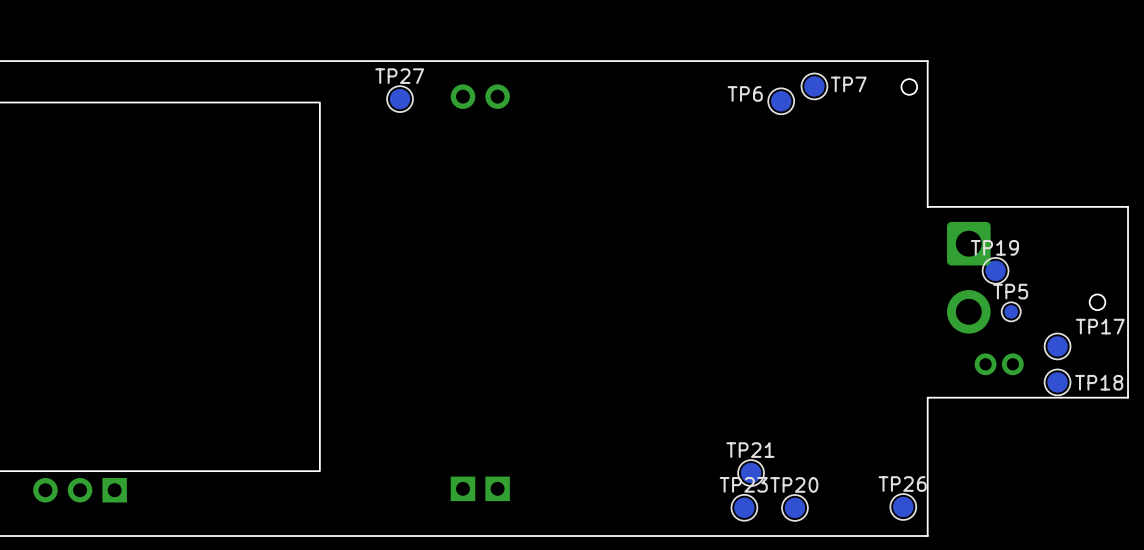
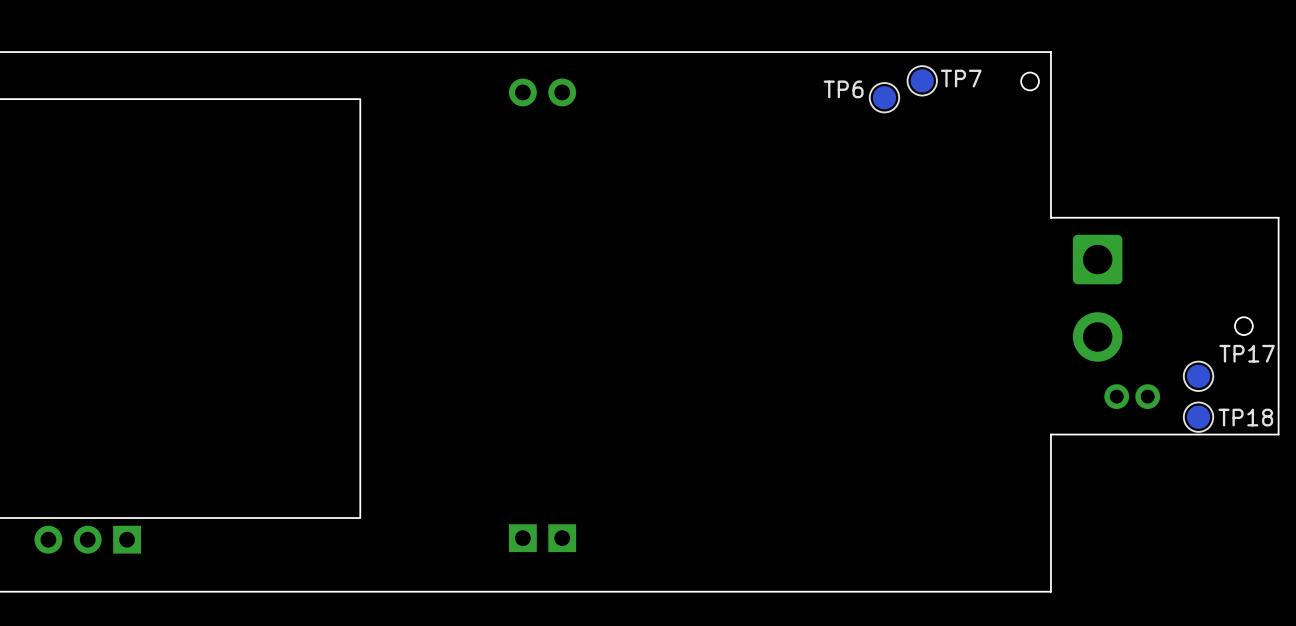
TP27: (400, 99) -> none
TP19: (995, 270) -> none
TP5: (1011, 311) -> none
TP21: (751, 473) -> none
TP26: (903, 506) -> none
TP23: (744, 507) -> none
TP20: (794, 507) -> none

